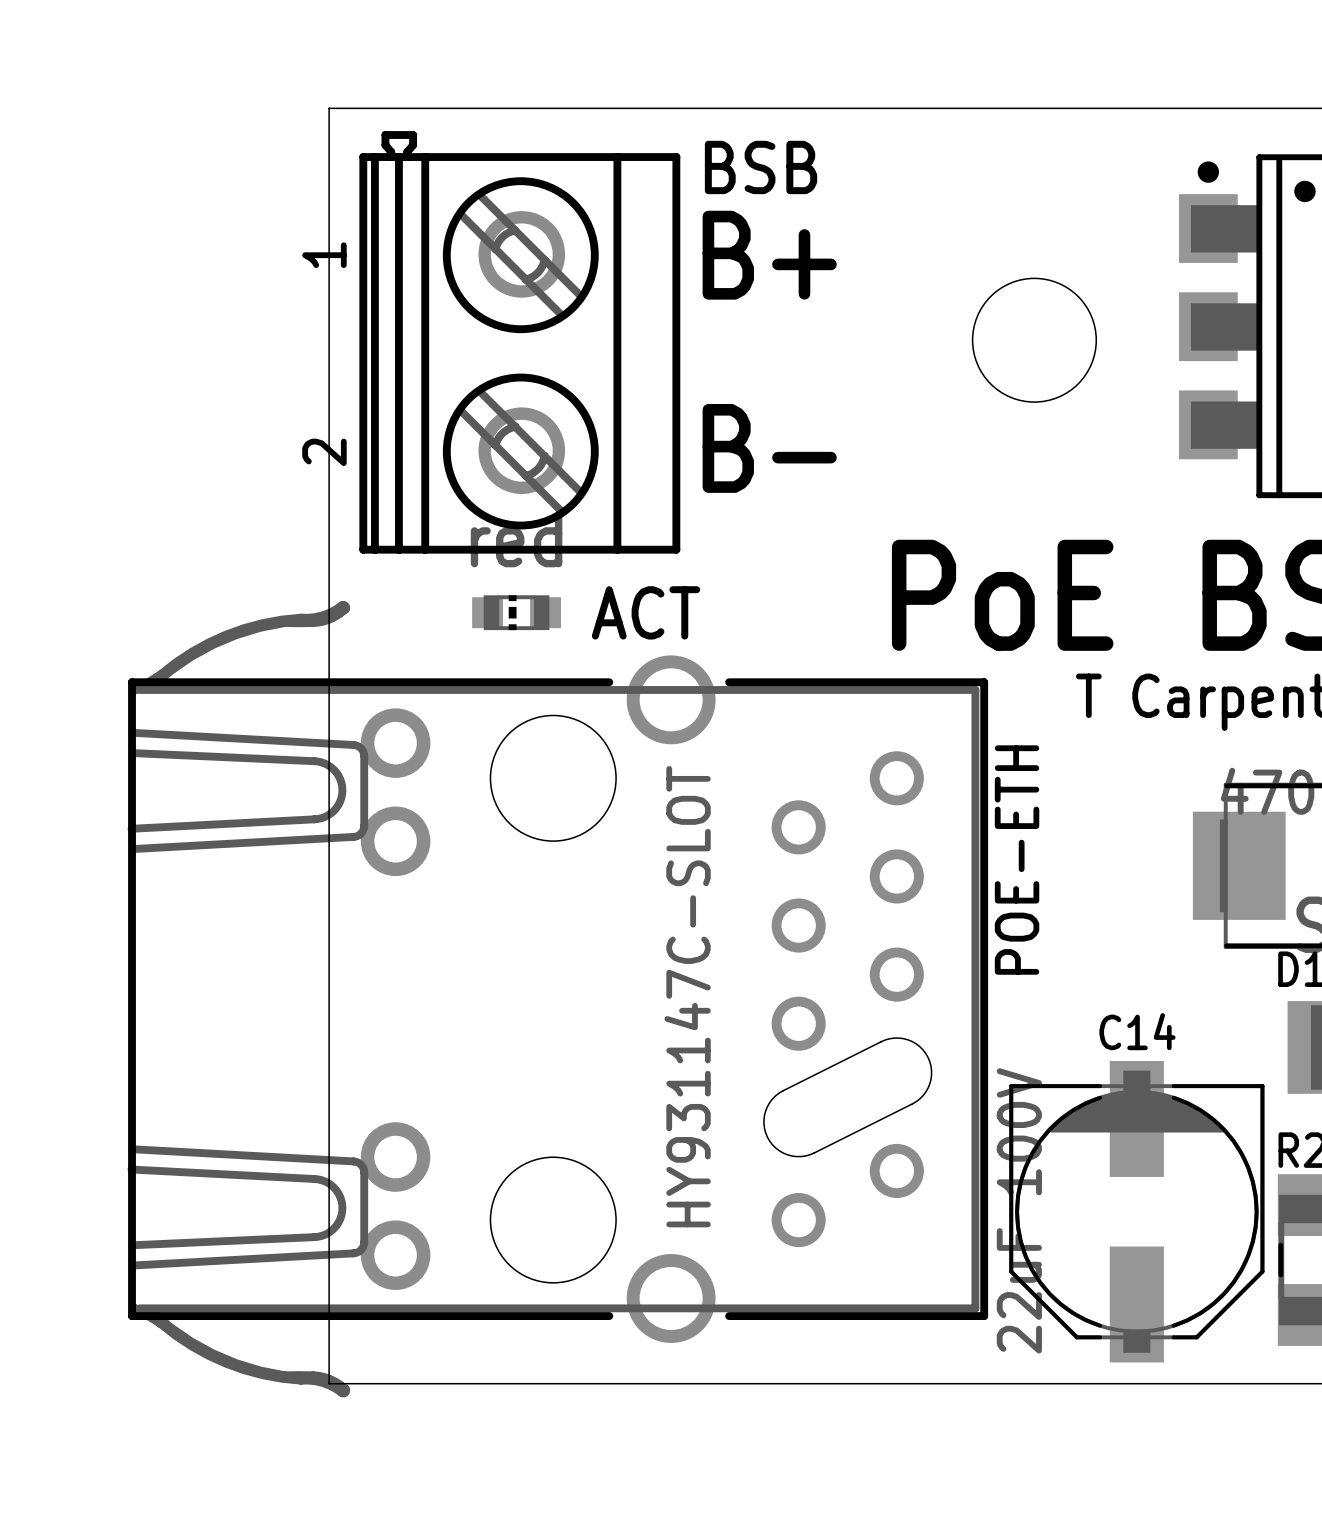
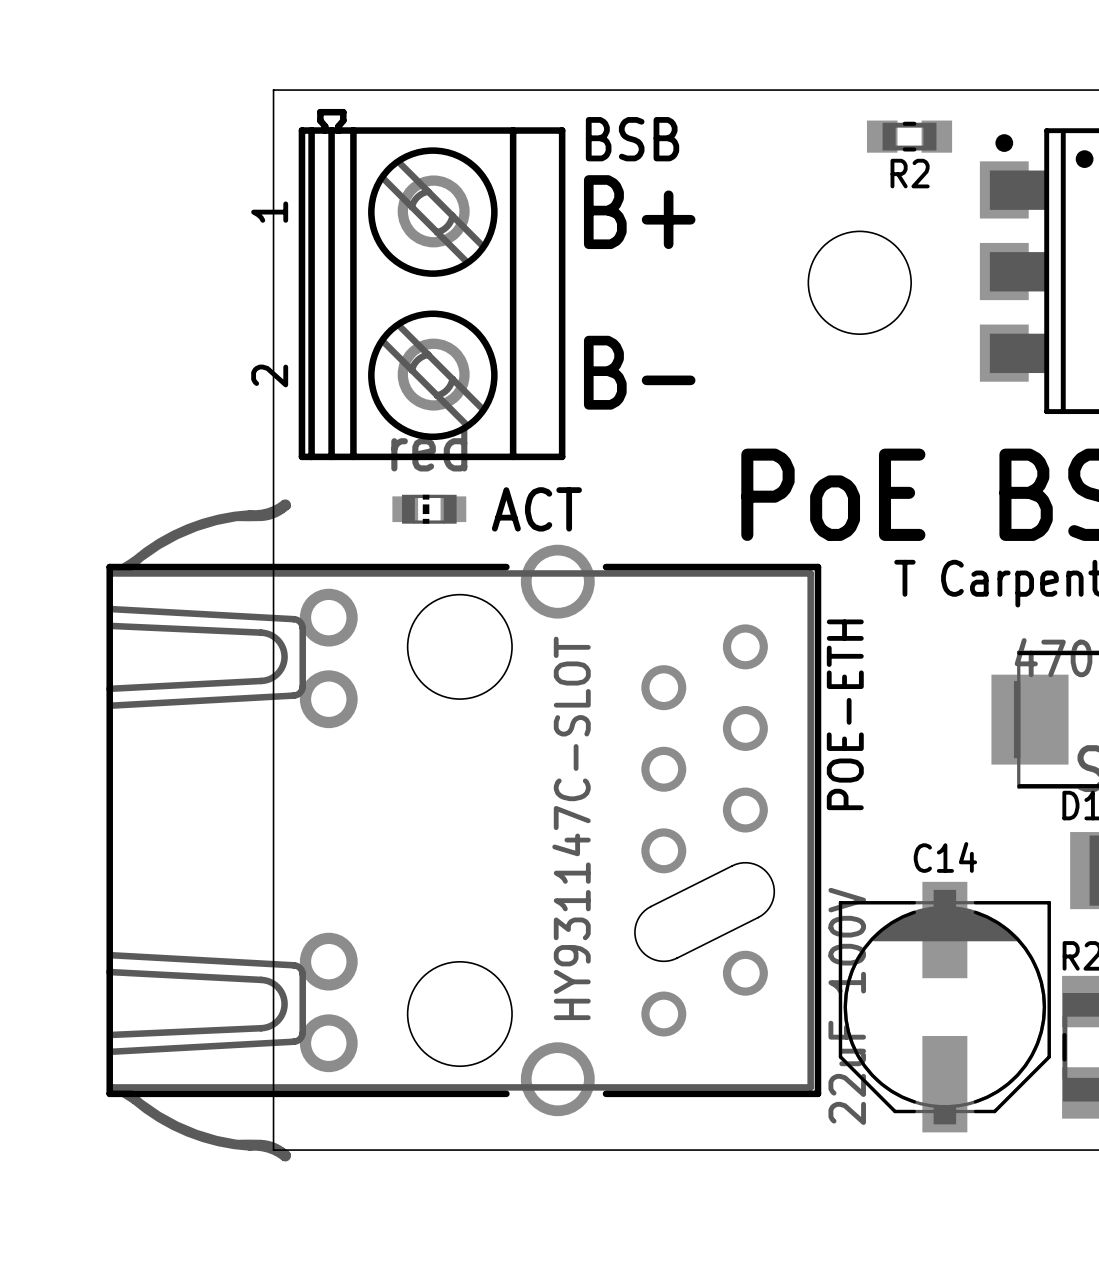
R2: none -> (909, 136)

